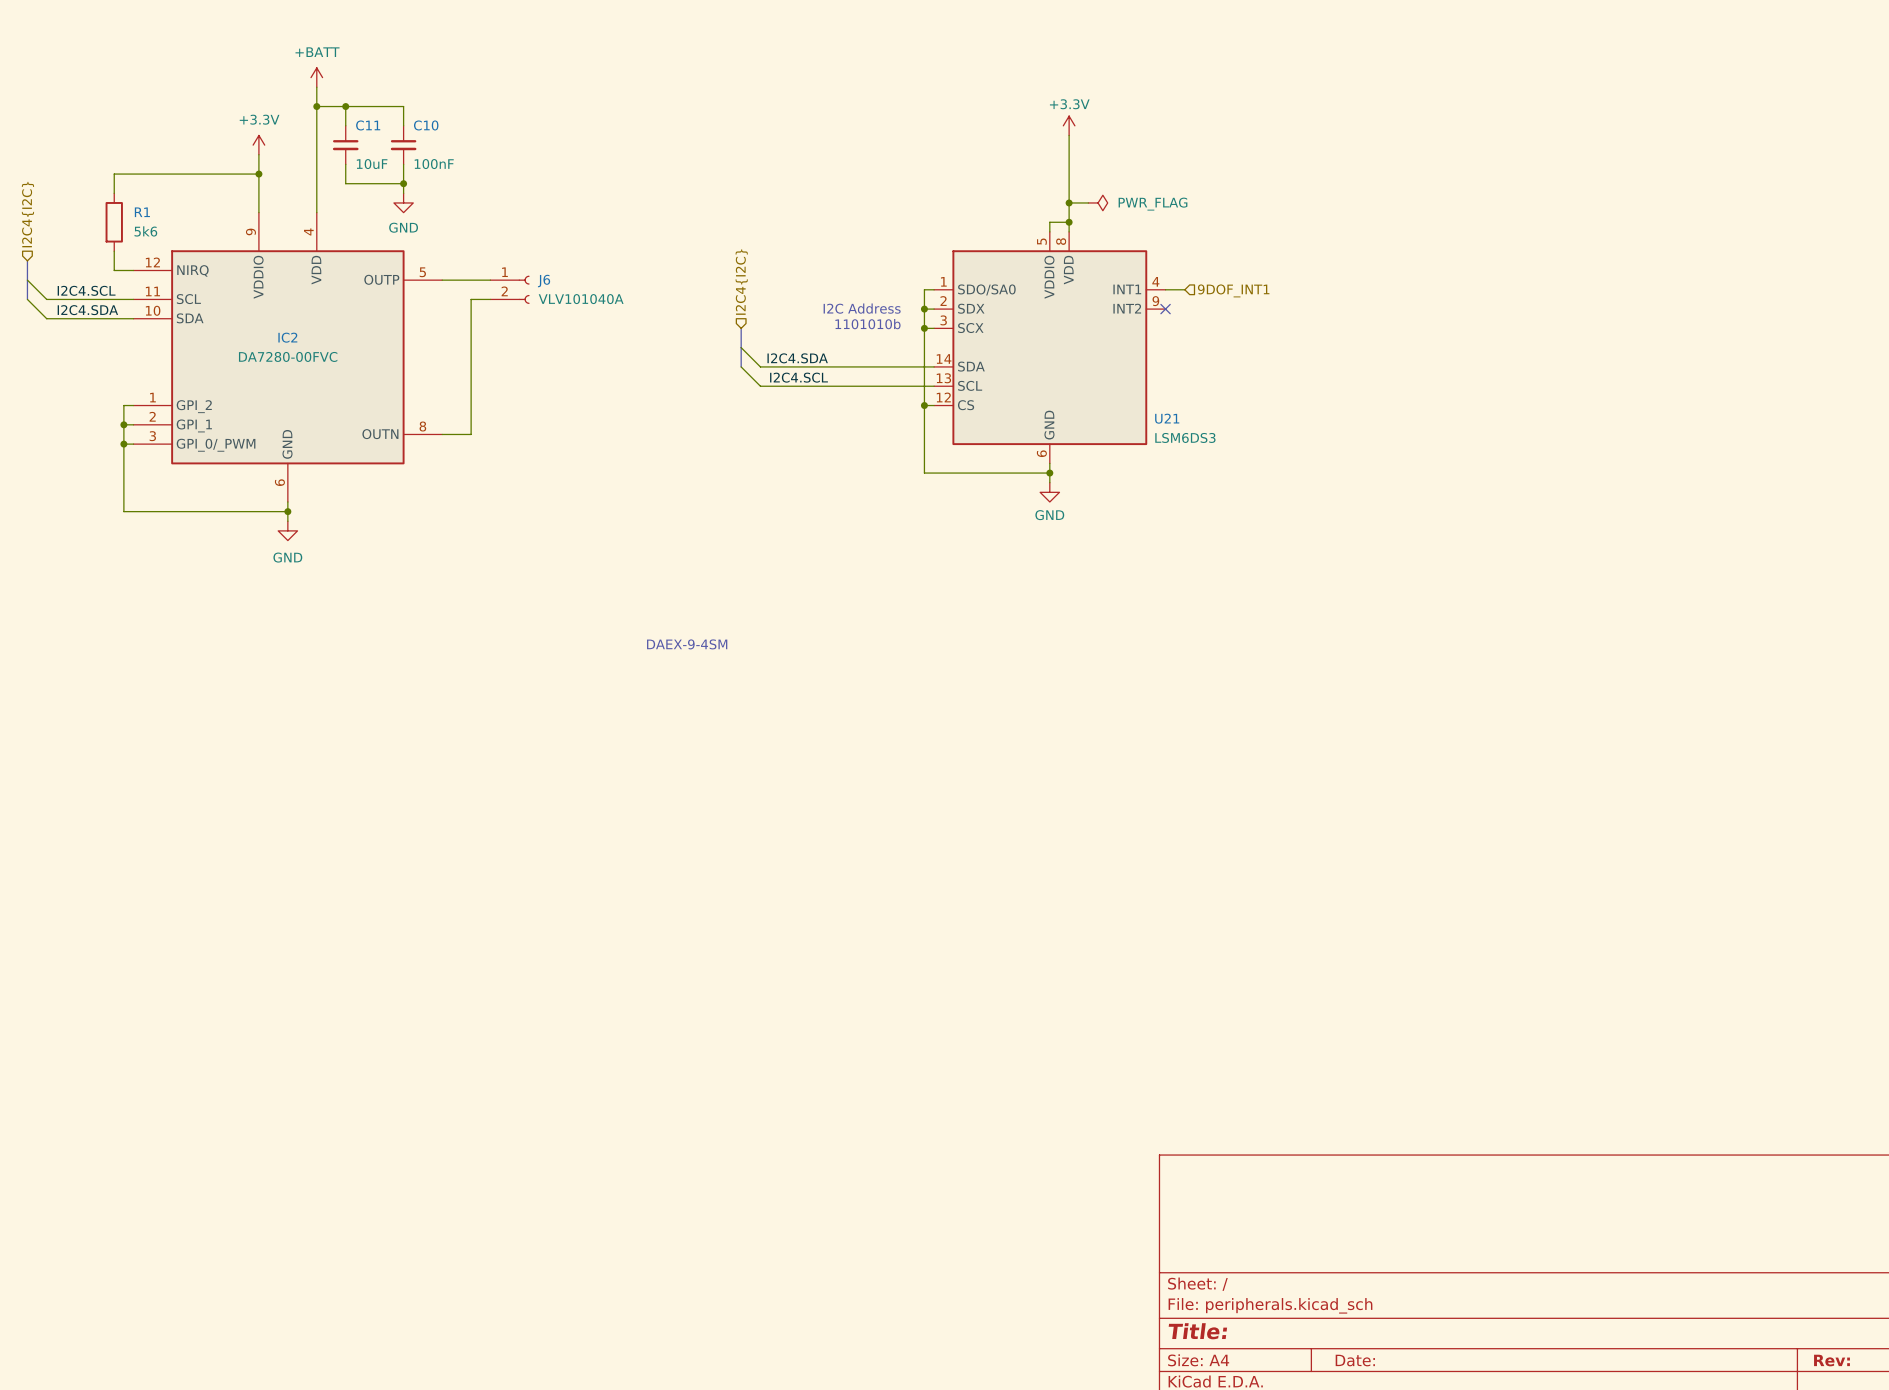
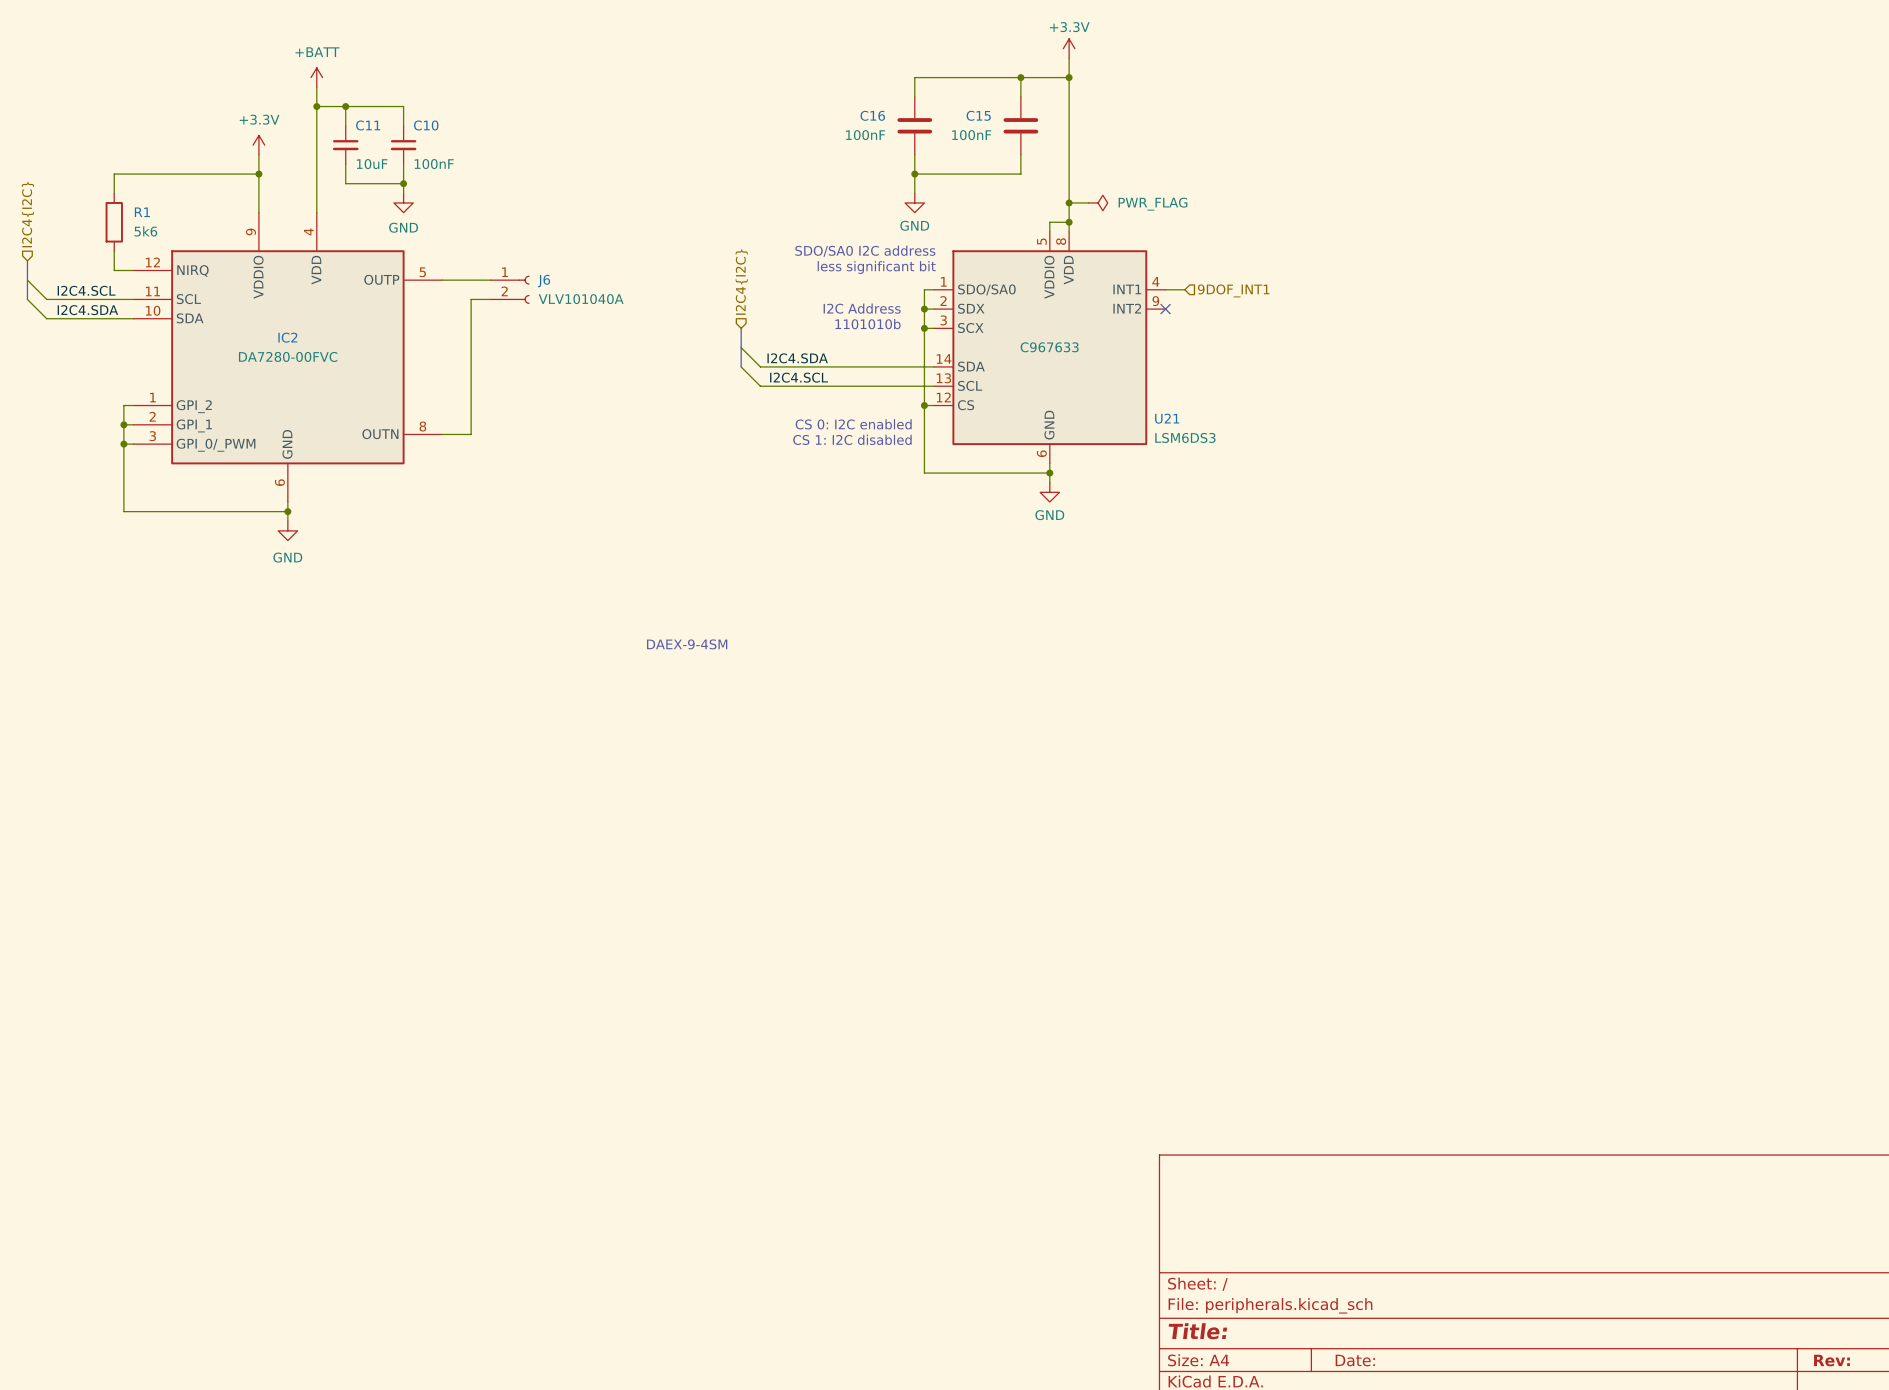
wire: none -> (1069, 58) (1069, 135)
wire: none -> (1020, 77) (1020, 96)
junction: none -> (1020, 77)
wire: none -> (1069, 77) (914, 77) (914, 96)
junction: none -> (1069, 77)
C16: none -> 100nF (914, 125)
C15: none -> 100nF (1020, 125)
power symbol position: +3.3V (1069, 125) -> +3.3V (1069, 48)
wire: none -> (914, 154) (914, 193)
wire: none -> (1020, 154) (1020, 174) (914, 174)
junction: none -> (914, 174)
power symbol: none -> GND (914, 202)
text: none -> SDO/SA0 I2C address (865, 251)
text: none -> less significant bit (876, 267)
U21 text: none -> C967633 (1049, 347)
text: none -> CS 0: I2C enabled (853, 424)
text: none -> CS 1: I2C disabled (852, 439)

